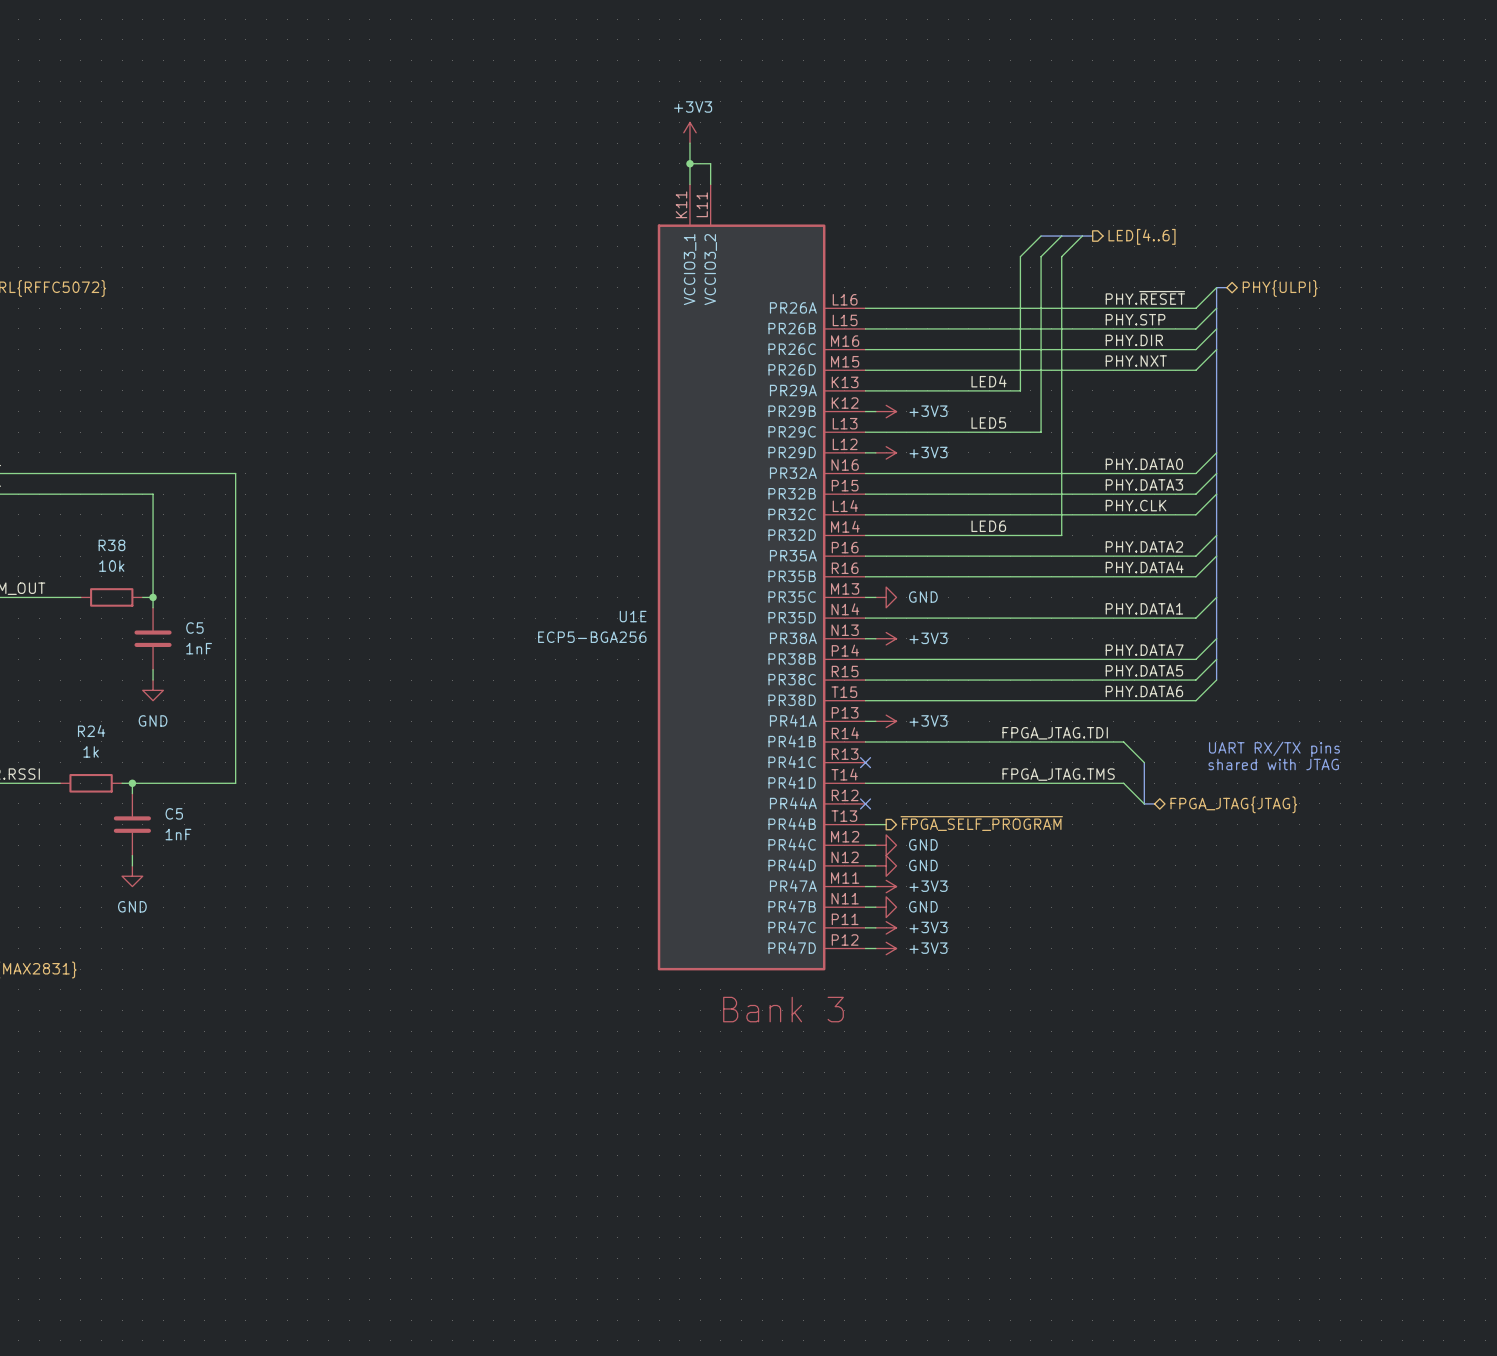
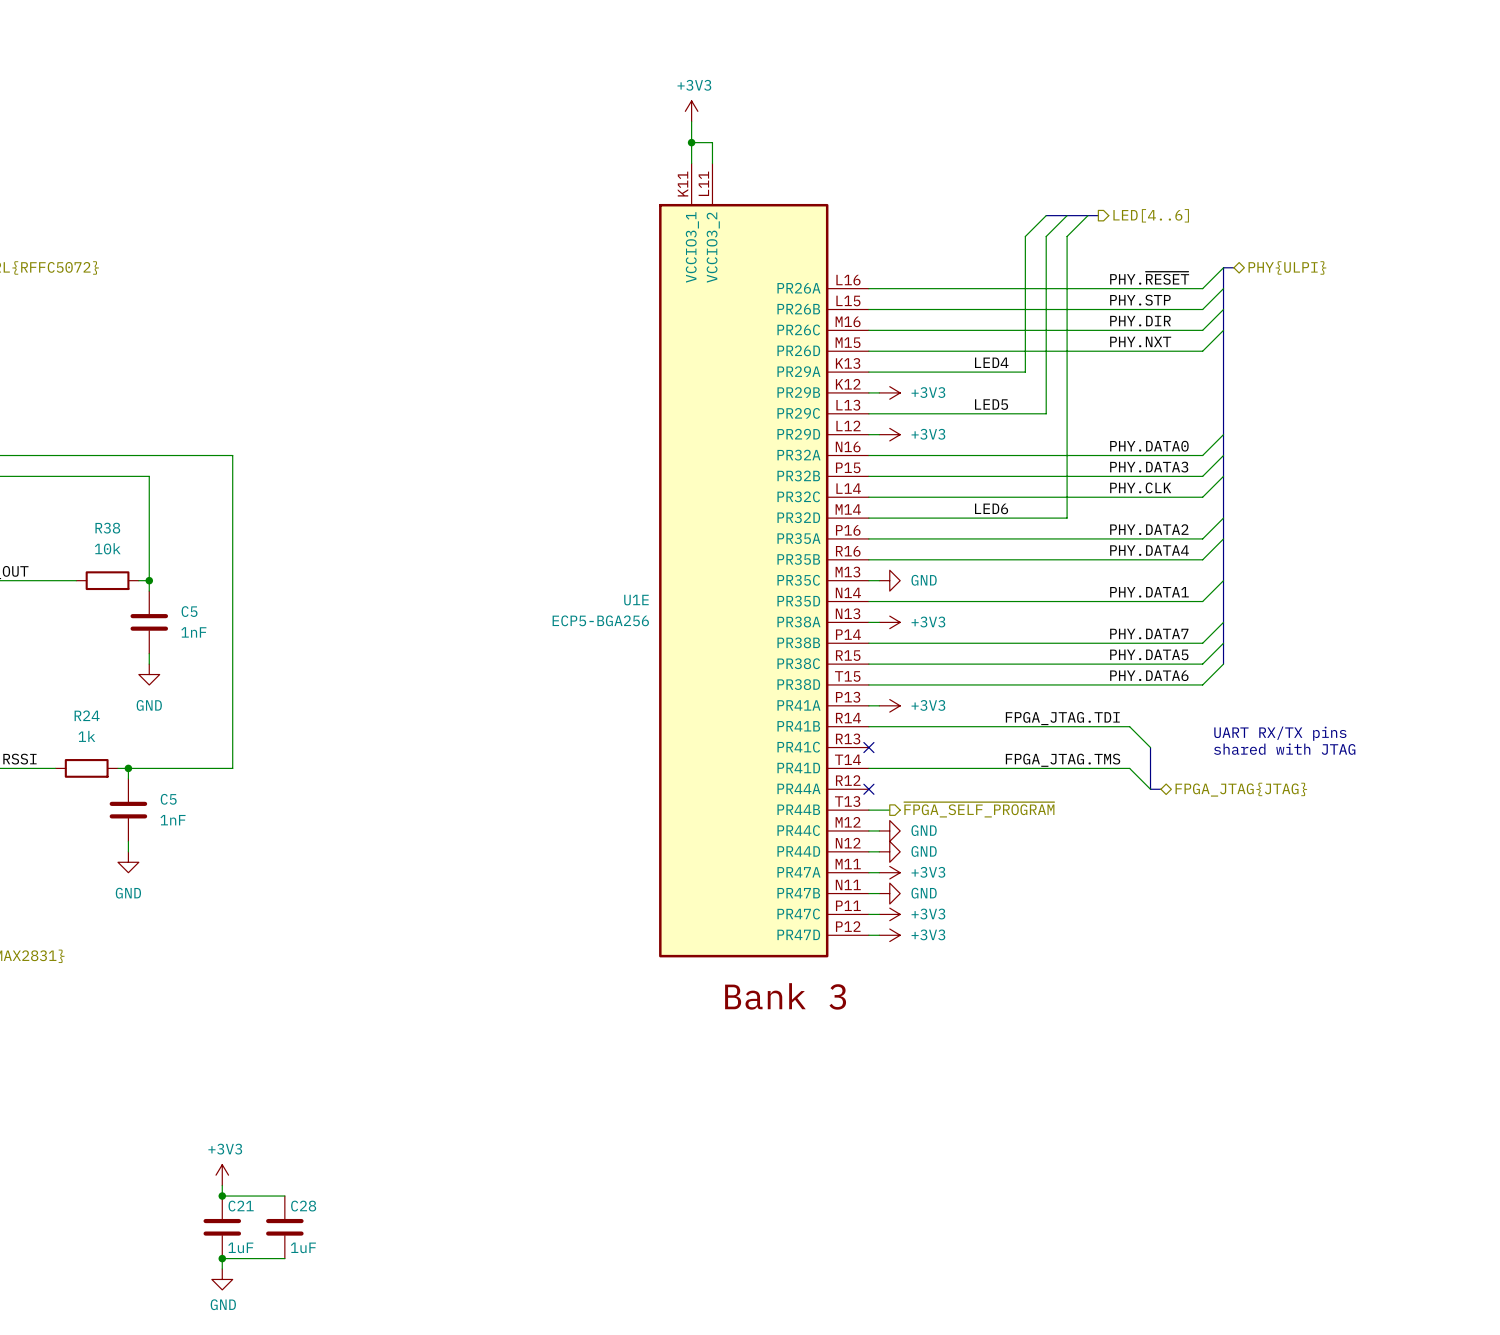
power symbol: none -> +3V3 (222, 1175)
wire: none -> (222, 1185) (222, 1196) (284, 1196)
junction: none -> (222, 1196)
C21: none -> 1uF (222, 1227)
C28: none -> 1uF (284, 1227)
junction: none -> (222, 1258)
wire: none -> (284, 1258) (222, 1258) (222, 1269)
power symbol: none -> GND (222, 1279)

